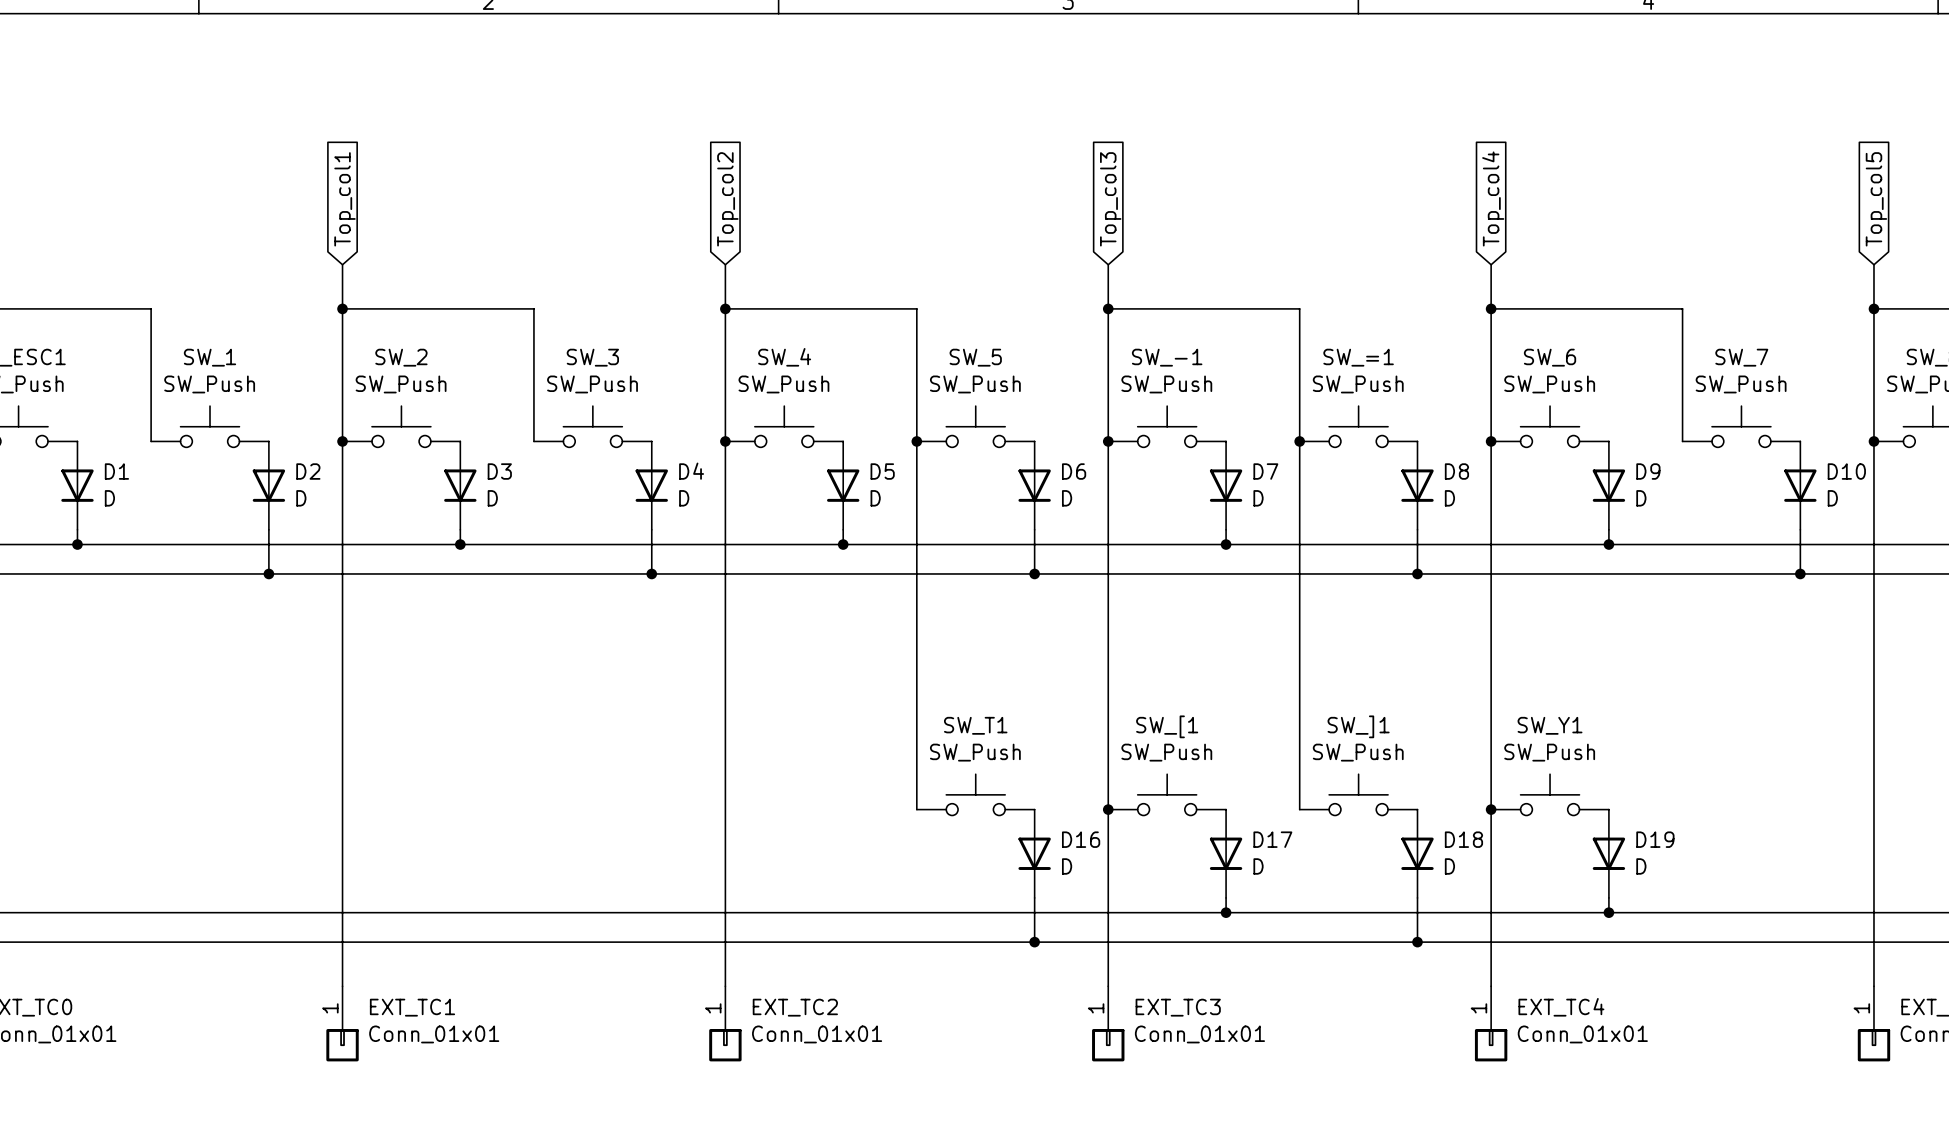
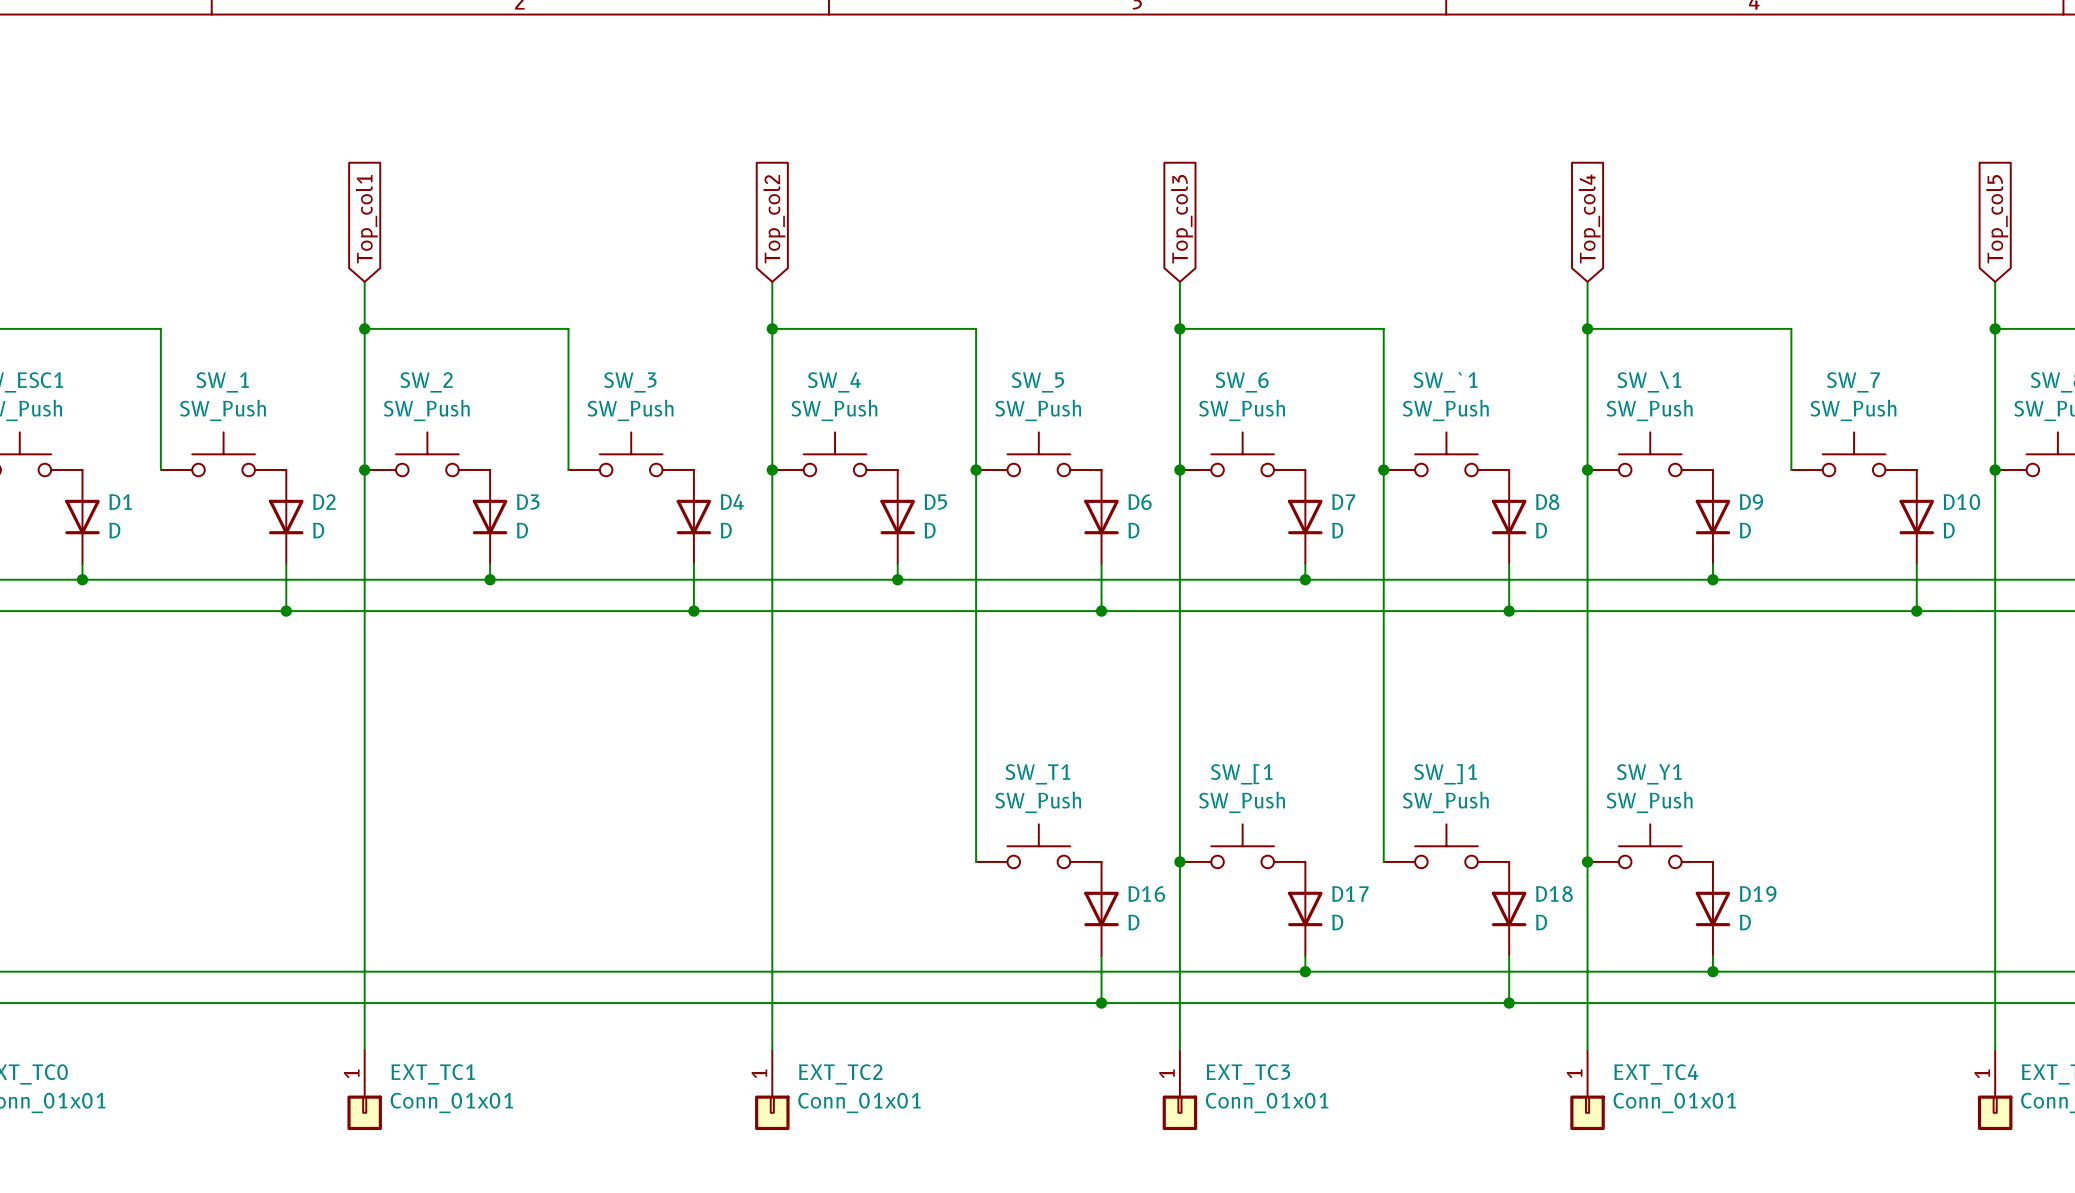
SW_-1 name: SW_-1 (1167, 357) -> SW_6 (1242, 382)
SW_=1 name: SW_=1 (1358, 357) -> SW_`1 (1445, 382)
SW_6 name: SW_6 (1550, 357) -> SW_\1 (1649, 381)

